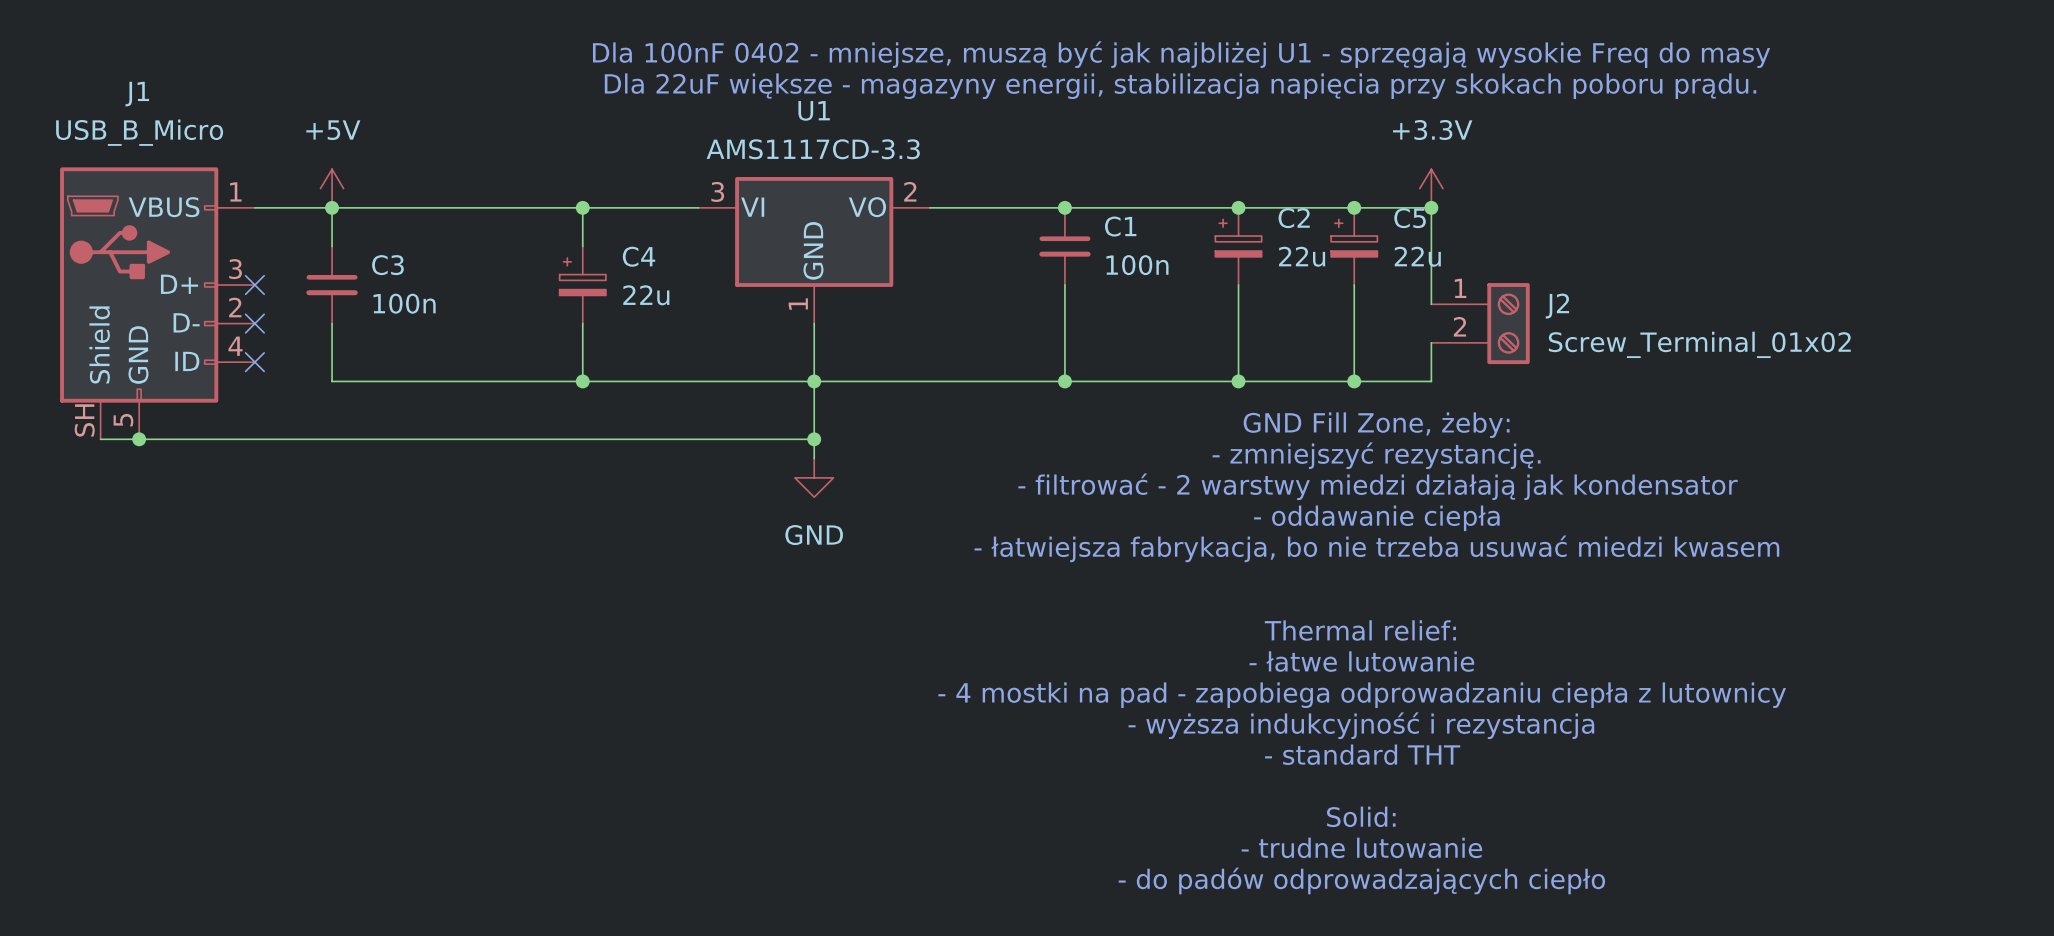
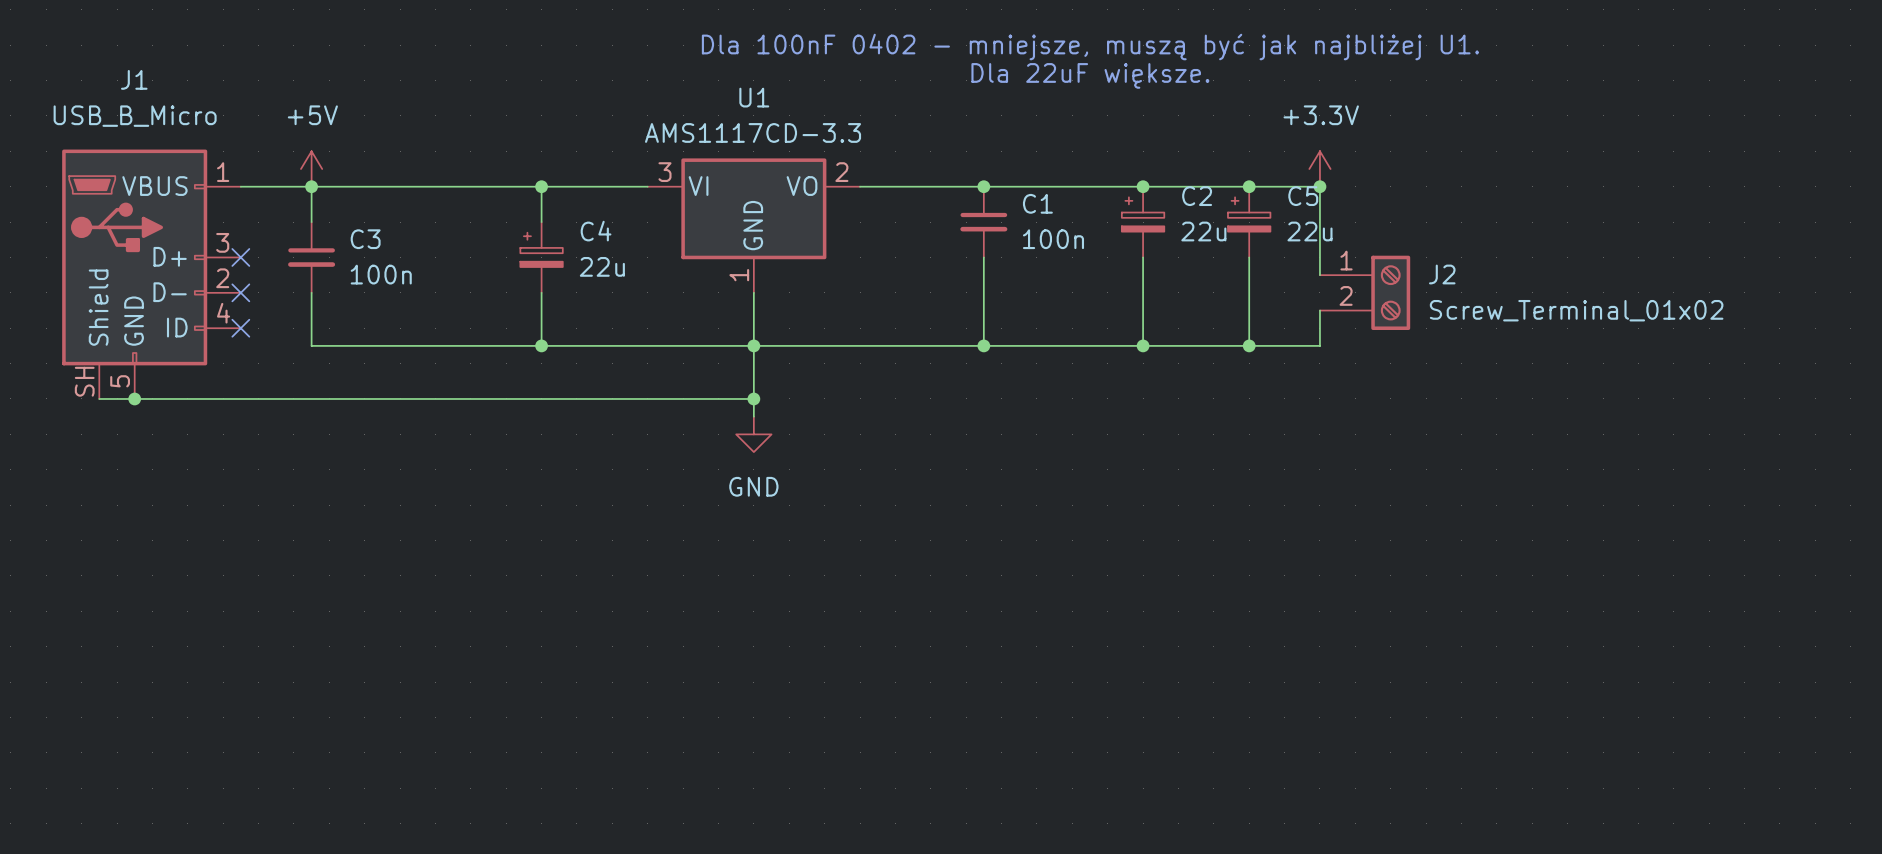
text: Dla 100nF 0402 - mniejsze, muszą być jak najbliżej U1 - sprzęgają wysokie Freq do masy (1181, 54) -> Dla 100nF 0402 - mniejsze, muszą być jak najbliżej U1. (1090, 47)
text: Dla 22uF większe - magazyny energii, stabilizacja napięcia przy skokach poboru prądu. (1180, 86) -> Dla 22uF większe. (1090, 75)
text: GND Fill Zone, żeby: (1376, 425) -> none
text: - zmniejszyć rezystancję. (1376, 455) -> none
text: - filtrować - 2 warstwy miedzi działają jak kondensator (1378, 486) -> none
text: - oddawanie ciepła (1376, 518) -> none
text: - łatwiejsza fabrykacja, bo nie trzeba usuwać miedzi kwasem (1376, 548) -> none
text: Thermal relief: (1360, 630) -> none
text: - łatwe lutowanie (1361, 661) -> none
text: - 4 mostki na pad - zapobiega odprowadzaniu ciepła z lutownicy (1362, 695) -> none
text: - wyższa indukcyjność i rezystancja (1361, 725) -> none
text: - standard THT (1362, 754) -> none
text: Solid: (1361, 816) -> none
text: - trudne lutowanie (1361, 847) -> none
text: - do padów odprowadzających ciepło (1361, 880) -> none

